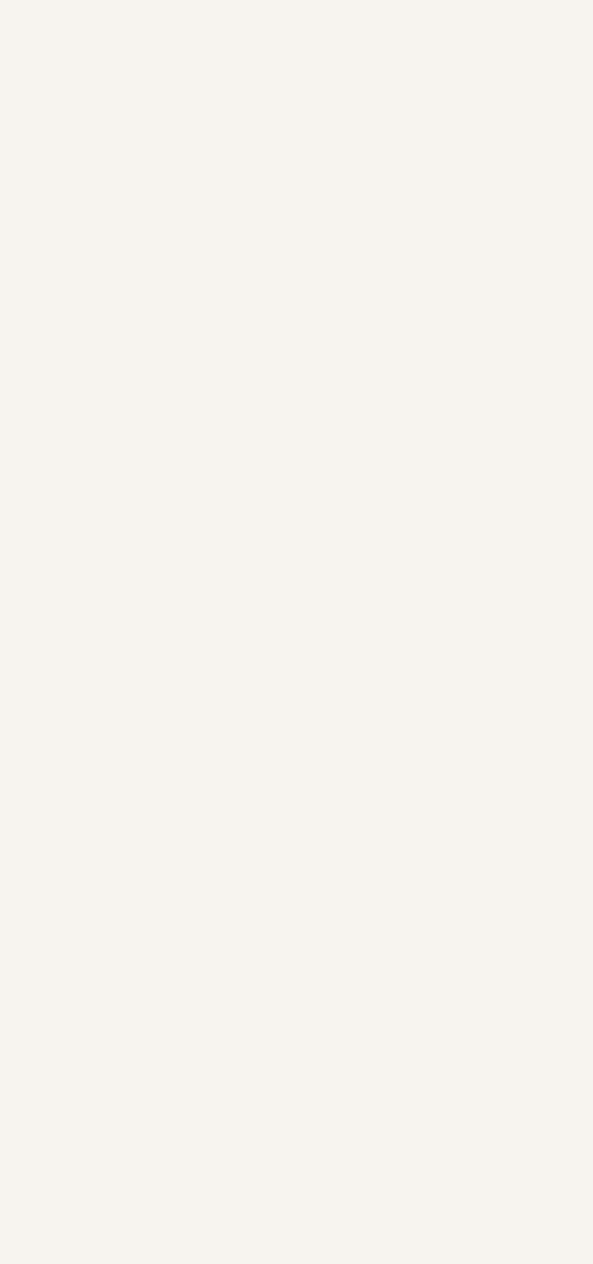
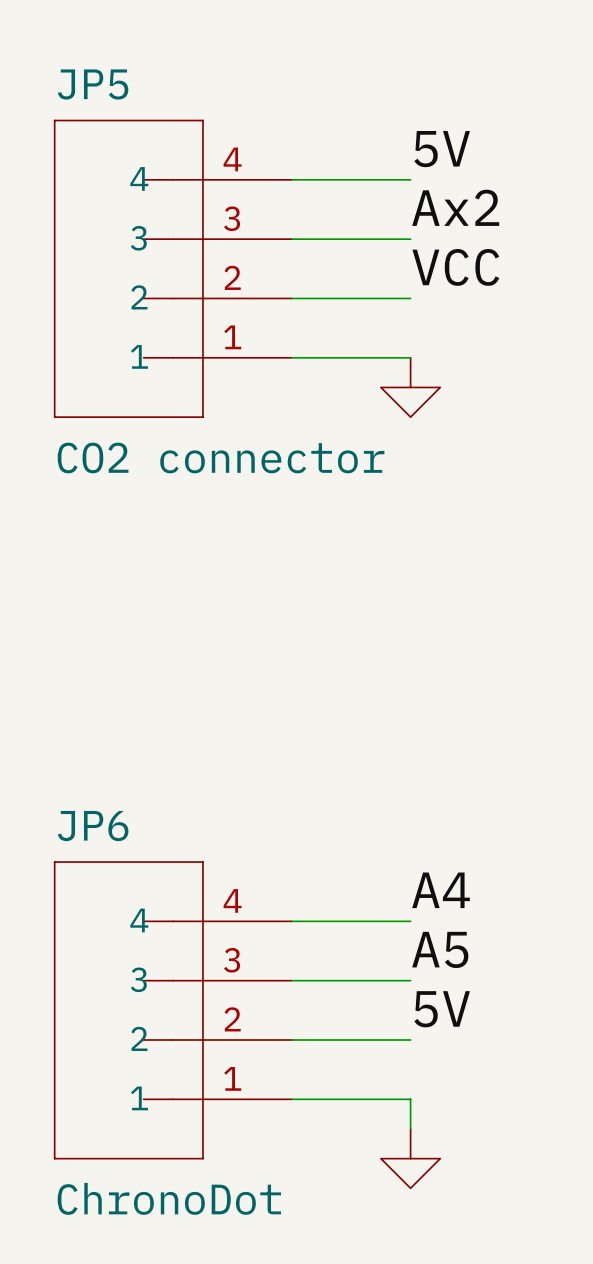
label: none -> 5V (442, 149)
wire: none -> (291, 179) (410, 179)
label: none -> Ax2 (455, 207)
wire: none -> (291, 239) (410, 239)
label: none -> VCC (455, 267)
JP5: none -> CO2 connector (173, 268)
wire: none -> (291, 298) (410, 298)
wire: none -> (291, 357) (410, 357)
power symbol: none -> (410, 387)
label: none -> A4 (441, 890)
wire: none -> (291, 921) (410, 921)
label: none -> A5 (440, 949)
wire: none -> (291, 980) (410, 980)
label: none -> 5V (442, 1009)
JP6: none -> ChronoDot (173, 1010)
wire: none -> (291, 1040) (410, 1040)
wire: none -> (291, 1099) (410, 1099) (410, 1128)
power symbol: none -> (410, 1158)

